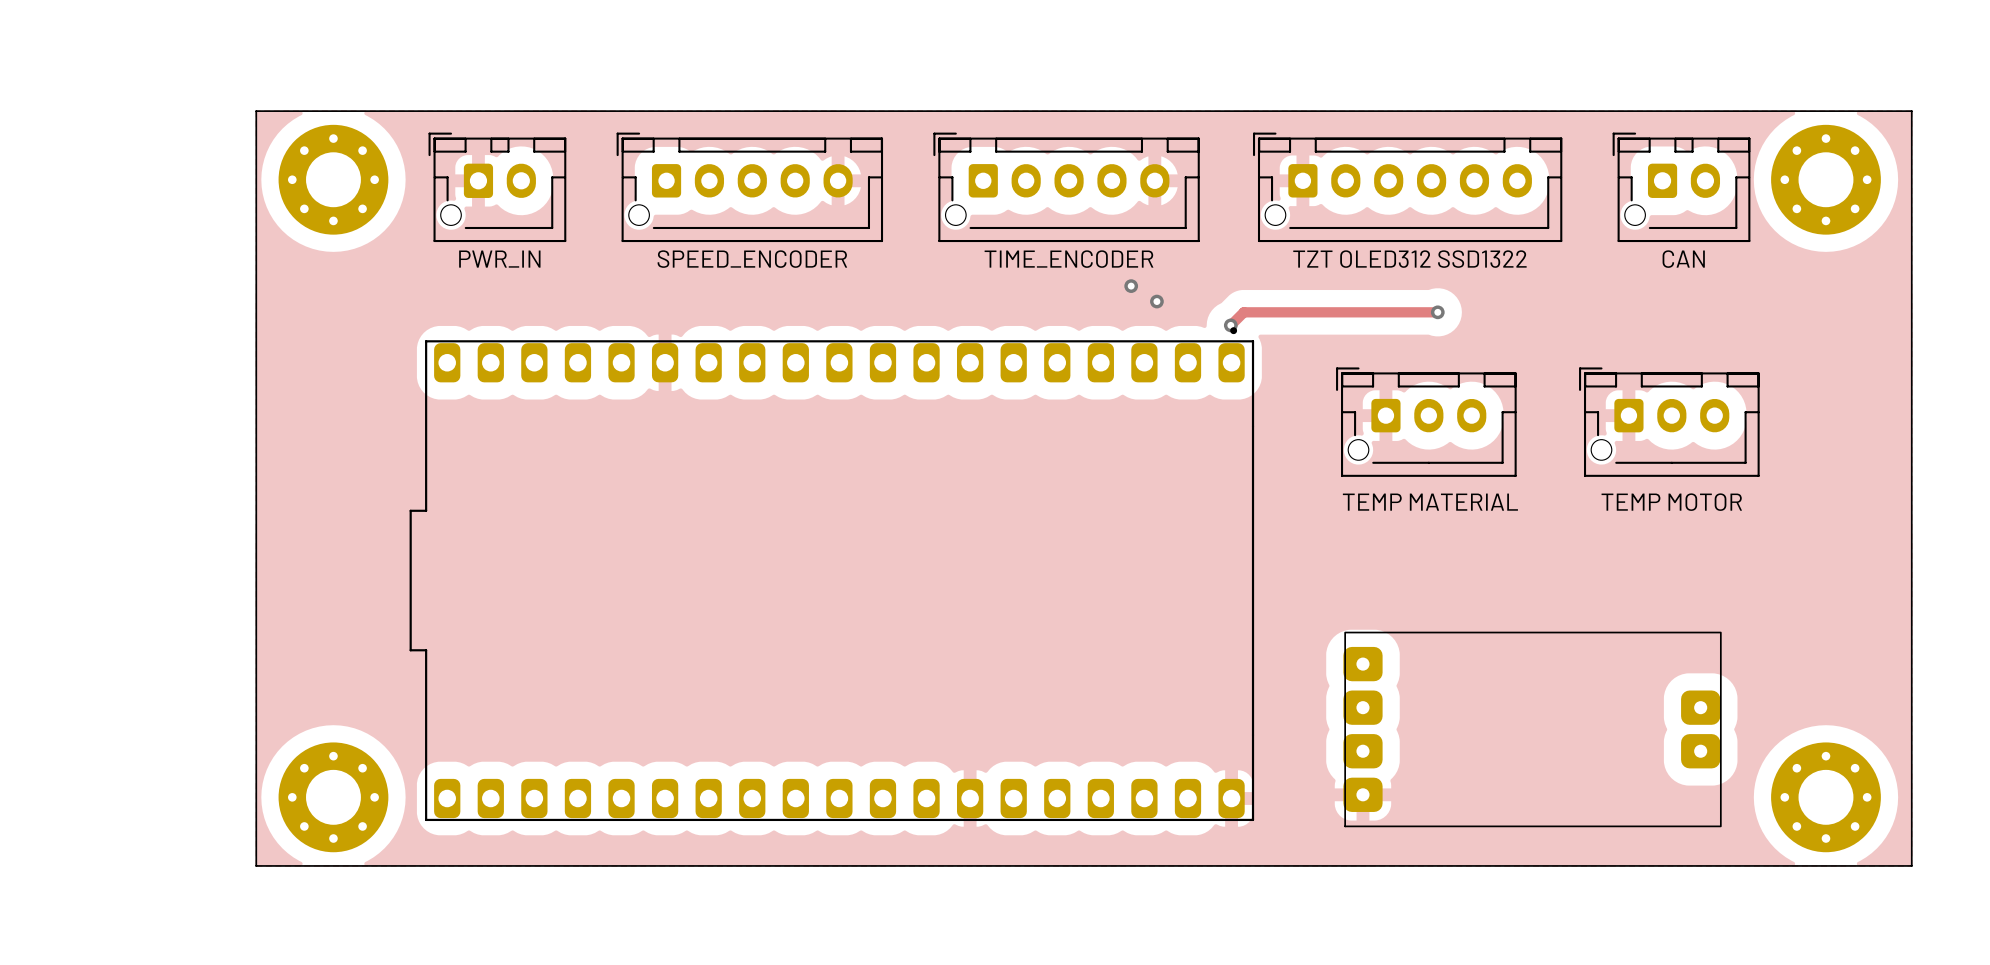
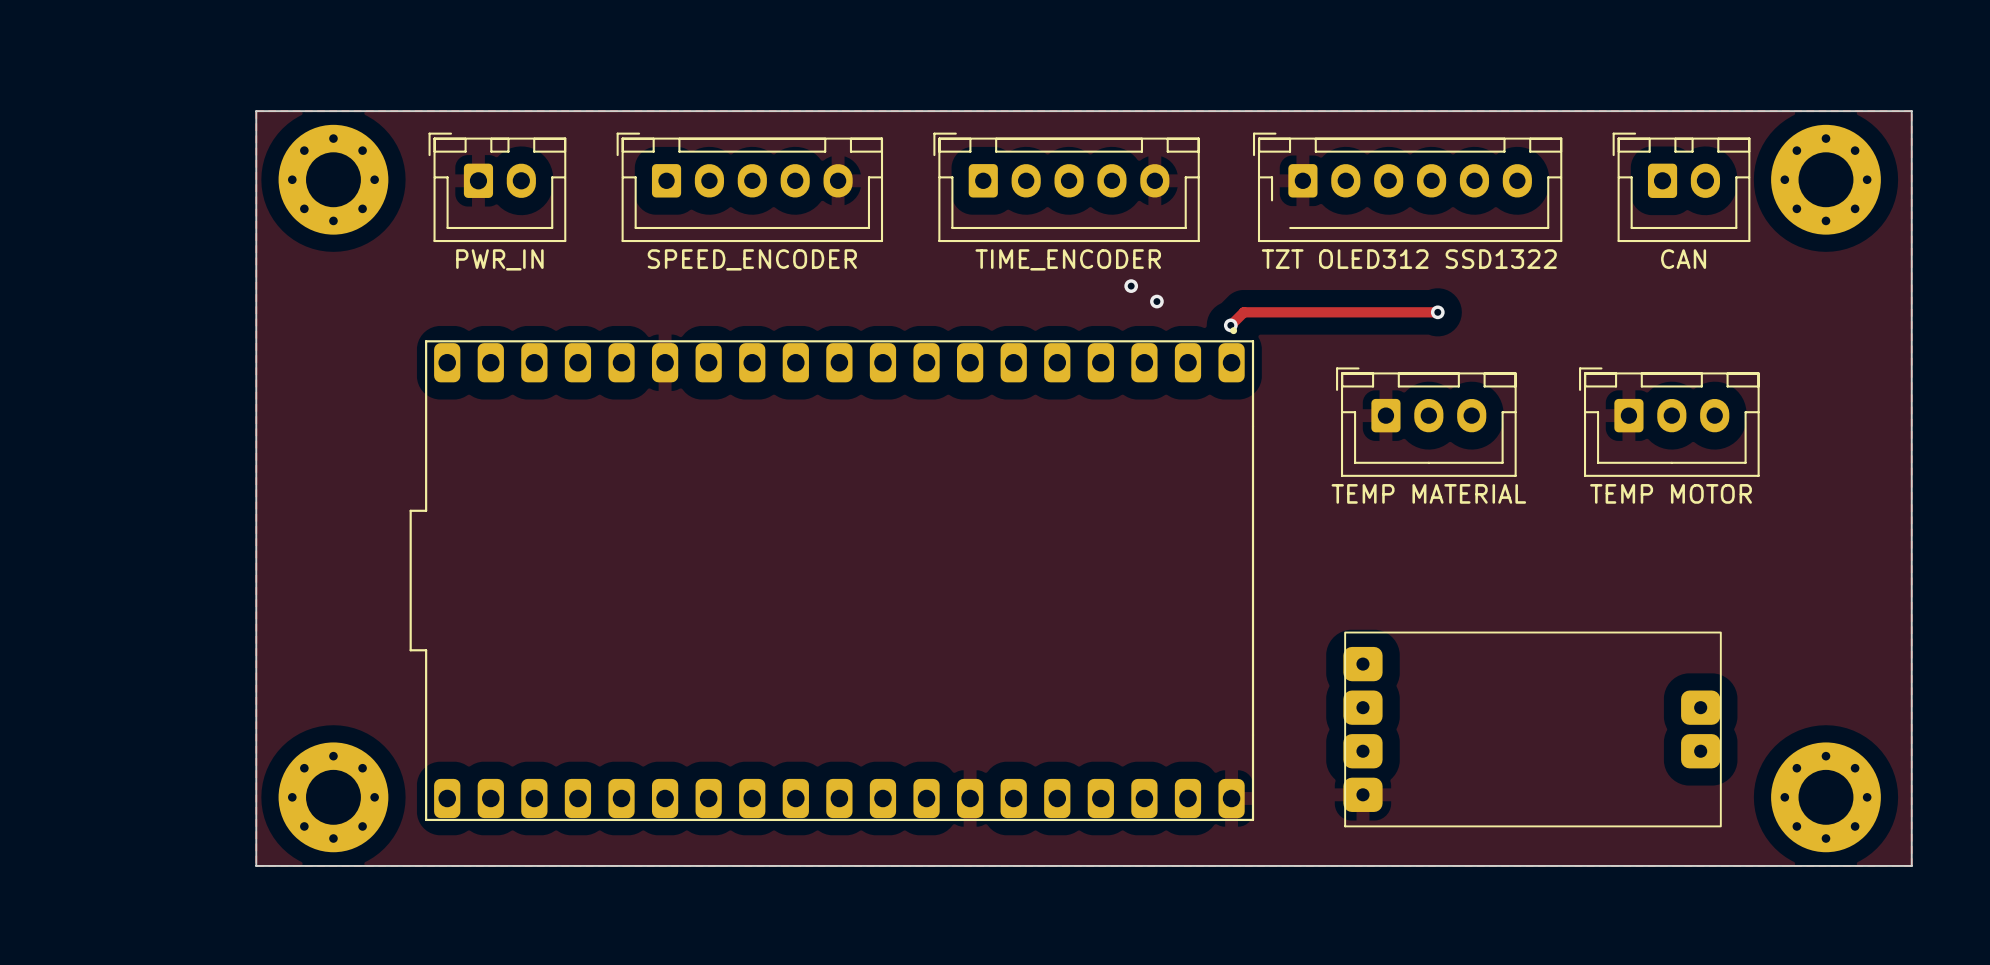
part footprint: [428, 132, 567, 243] -> [428, 132, 567, 243]
part footprint: [616, 132, 884, 243] -> [616, 132, 884, 243]
part footprint: [933, 132, 1200, 243] -> [933, 132, 1200, 243]
part footprint: [1252, 132, 1563, 243] -> [1252, 132, 1563, 243]
part footprint: [1612, 132, 1751, 243] -> [1612, 132, 1751, 243]
part footprint: [1336, 367, 1517, 477] -> [1336, 367, 1517, 477]
part footprint: [1579, 367, 1760, 477] -> [1579, 367, 1760, 477]

